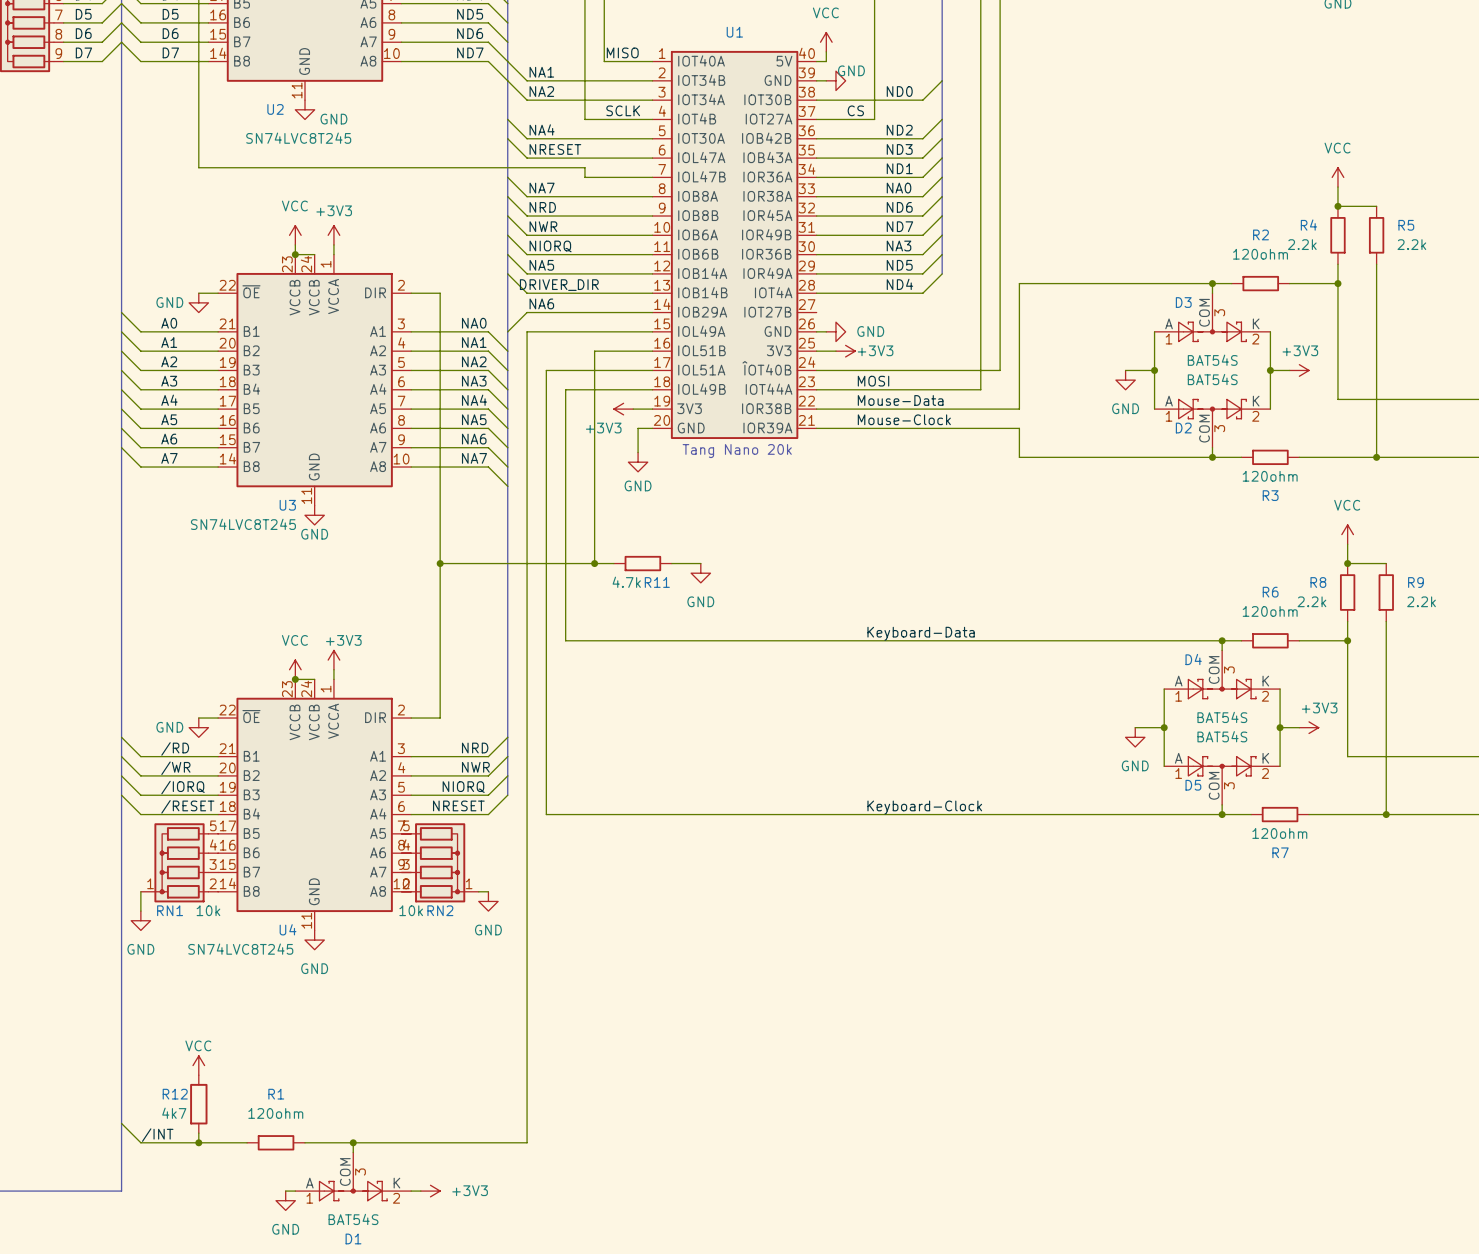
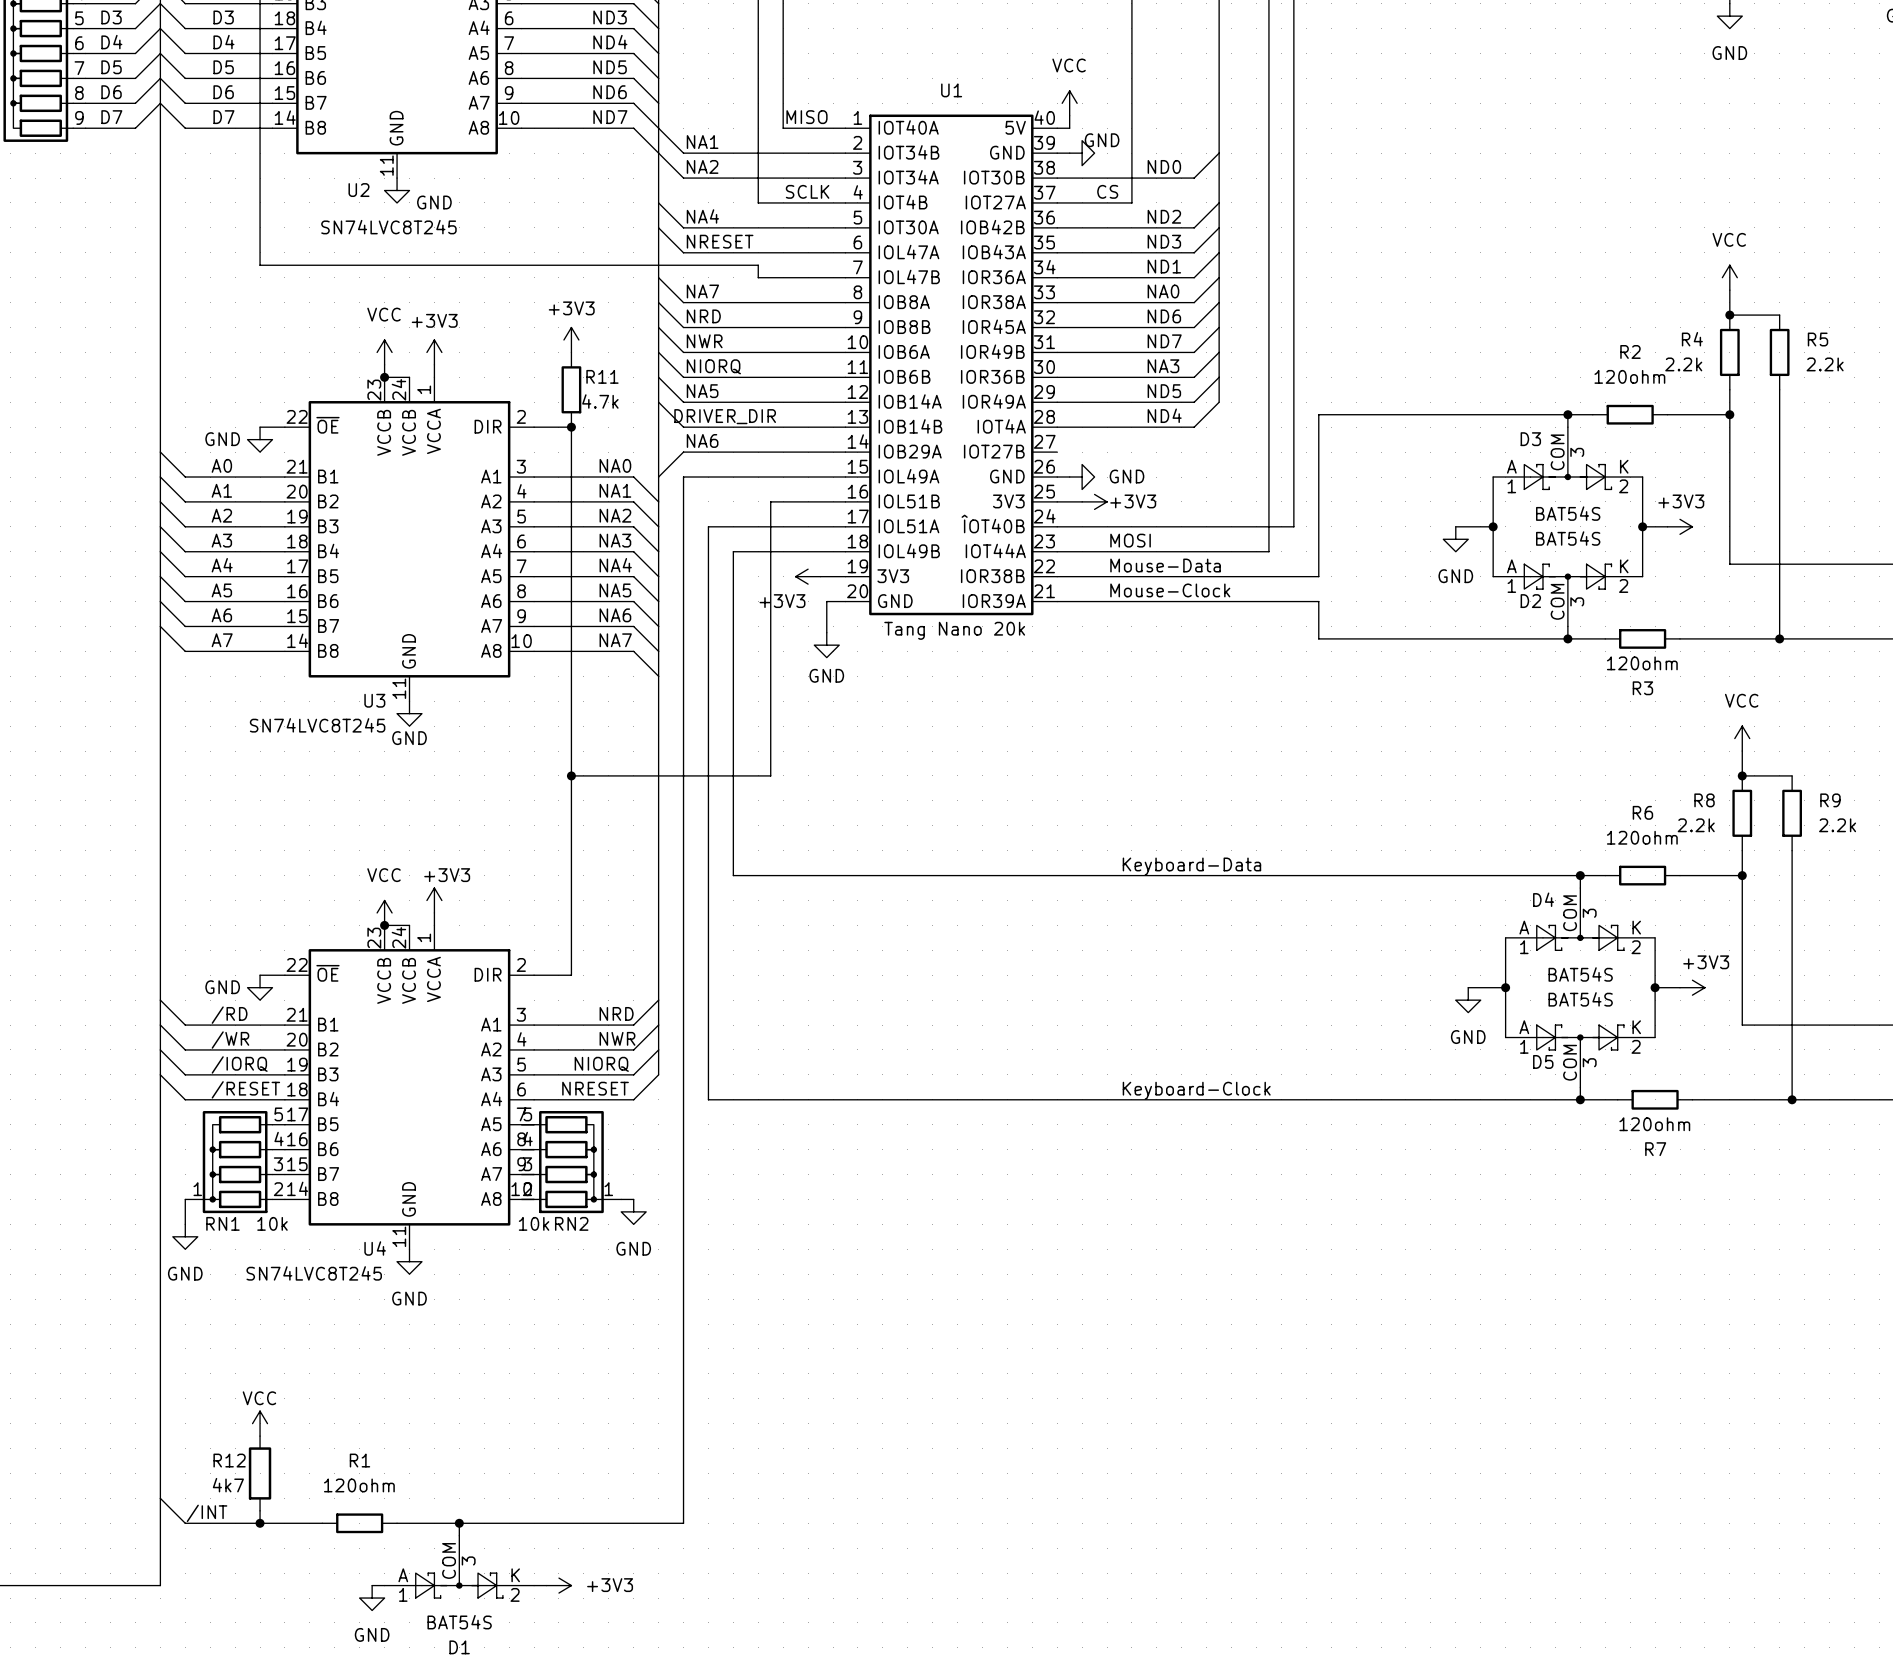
power symbol: none -> +3V3 (571, 339)
junction: none -> (571, 427)
wire: (594, 563) (613, 563) -> none
junction: (594, 563) -> none
R11 rotation: 0° (642, 563) -> 90° clockwise (571, 389)
R11 position: (642, 563) -> (571, 389)
wire: (671, 563) (700, 563) -> none
power symbol: GND (700, 573) -> none
R11 value position: 4.7k (626, 582) -> 4.7k (600, 401)
R11 name position: R11 (657, 582) -> R11 (602, 376)

